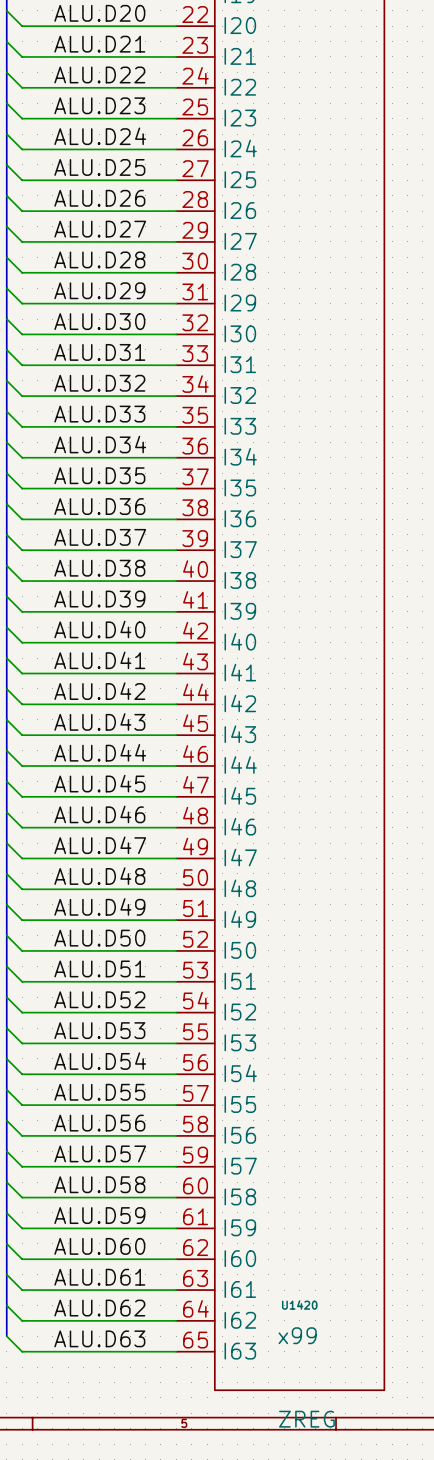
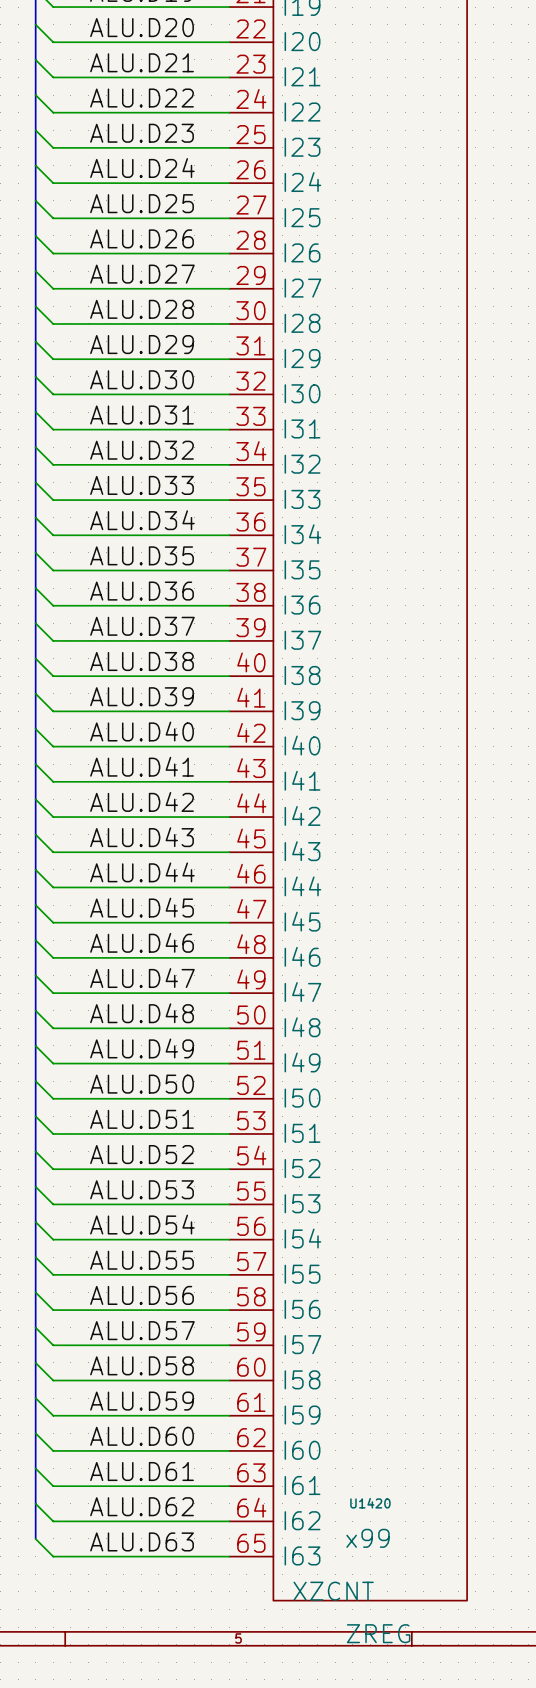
U1420 value: none -> XZCNT (333, 1591)

